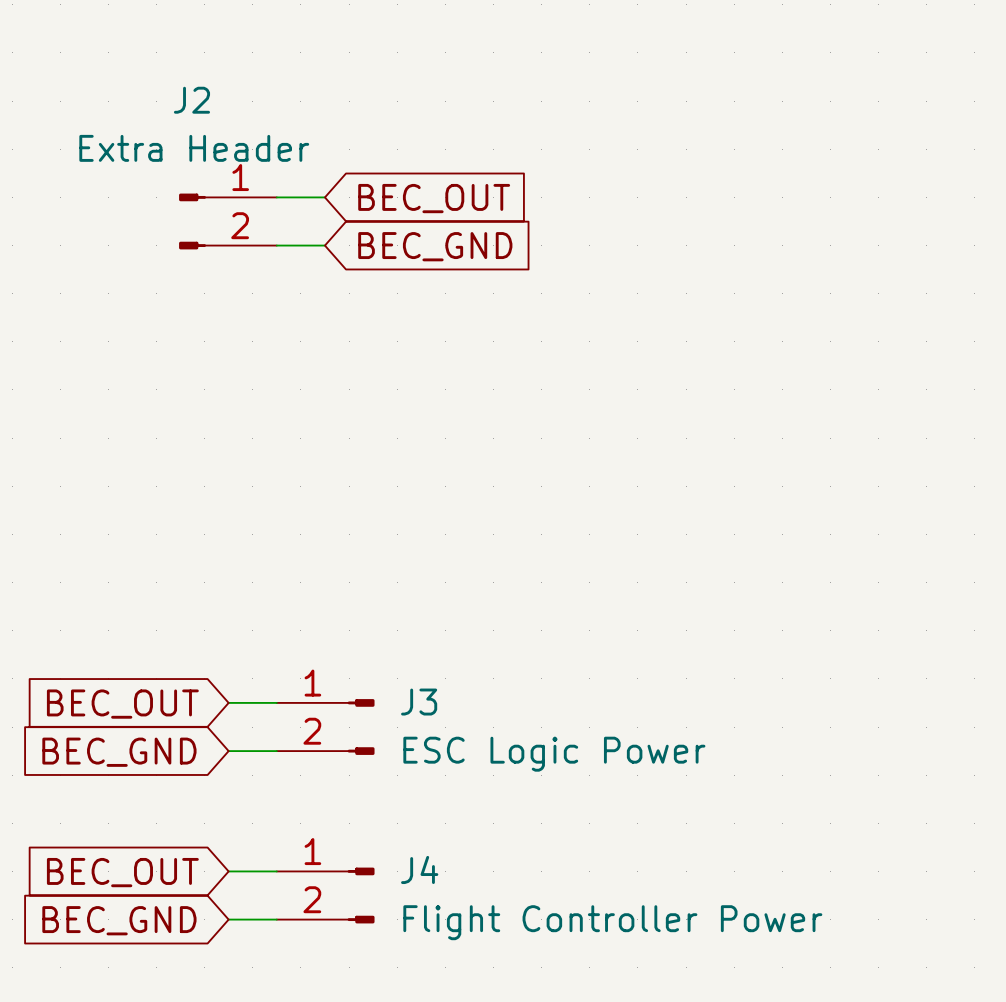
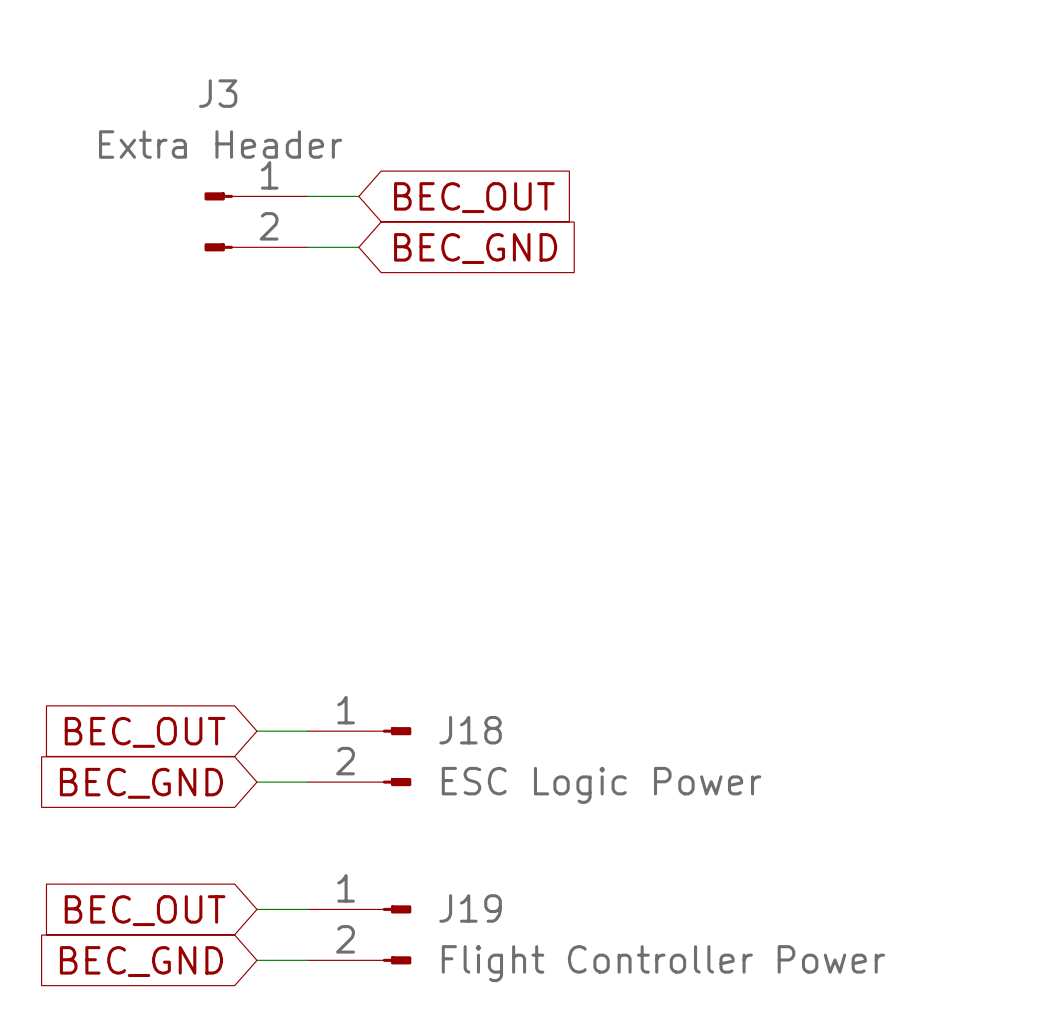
J2 name: J2 (191, 100) -> J3 (218, 93)
J3 name: J3 (419, 702) -> J18 (470, 730)
J4 name: J4 (419, 869) -> J19 (470, 908)

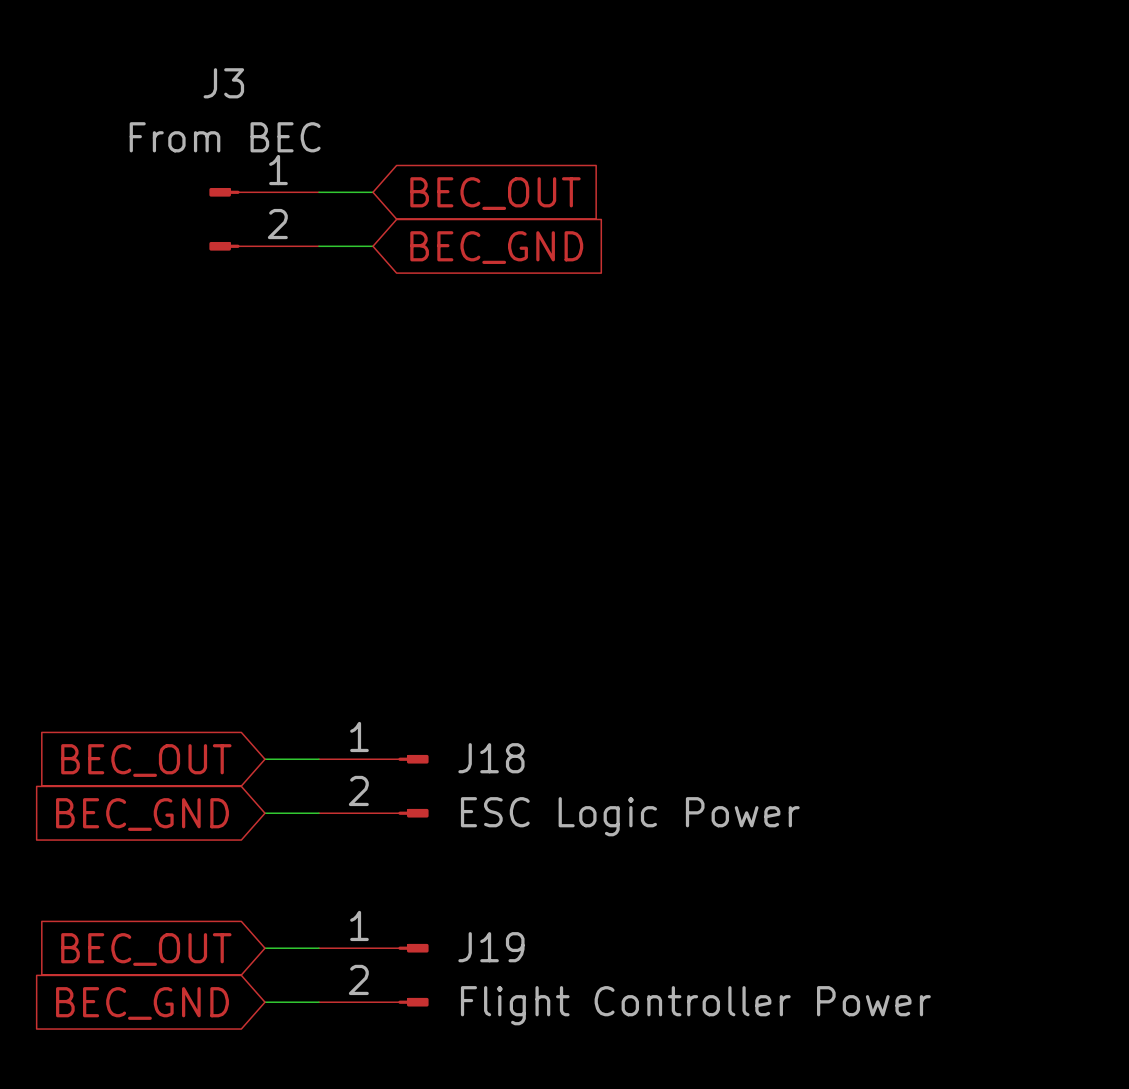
J3 value: Extra Header (220, 144) -> From BEC (225, 137)

